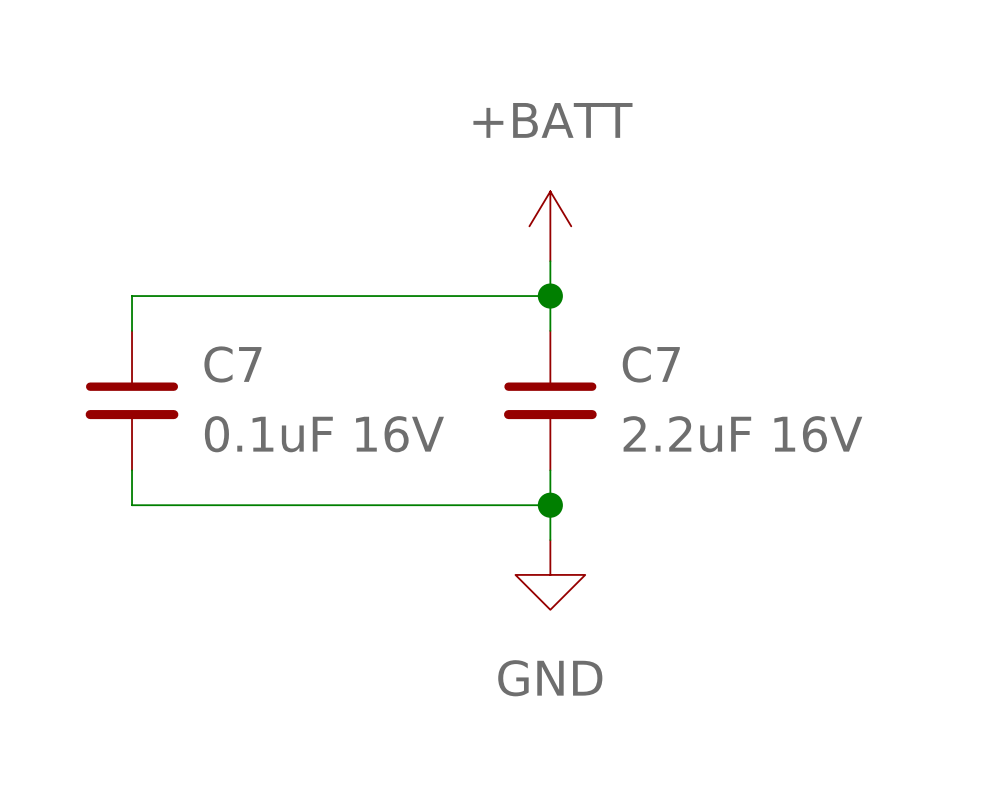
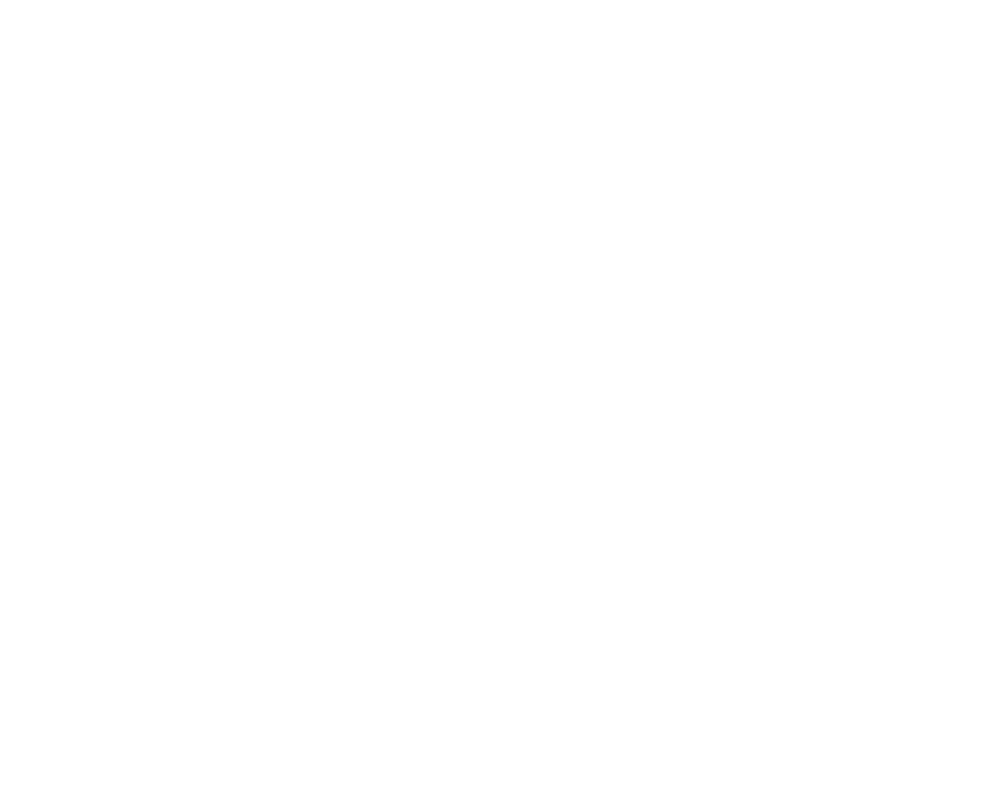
power symbol: +BATT (550, 226) -> none
wire: (550, 261) (550, 330) -> none
wire: (550, 296) (132, 296) (132, 330) -> none
junction: (550, 296) -> none
C7: 0.1uF 16V (132, 400) -> none
C7: 2.2uF 16V (550, 400) -> none
wire: (132, 470) (132, 505) (550, 505) -> none
wire: (550, 470) (550, 540) -> none
junction: (550, 505) -> none
power symbol: GND (550, 574) -> none

